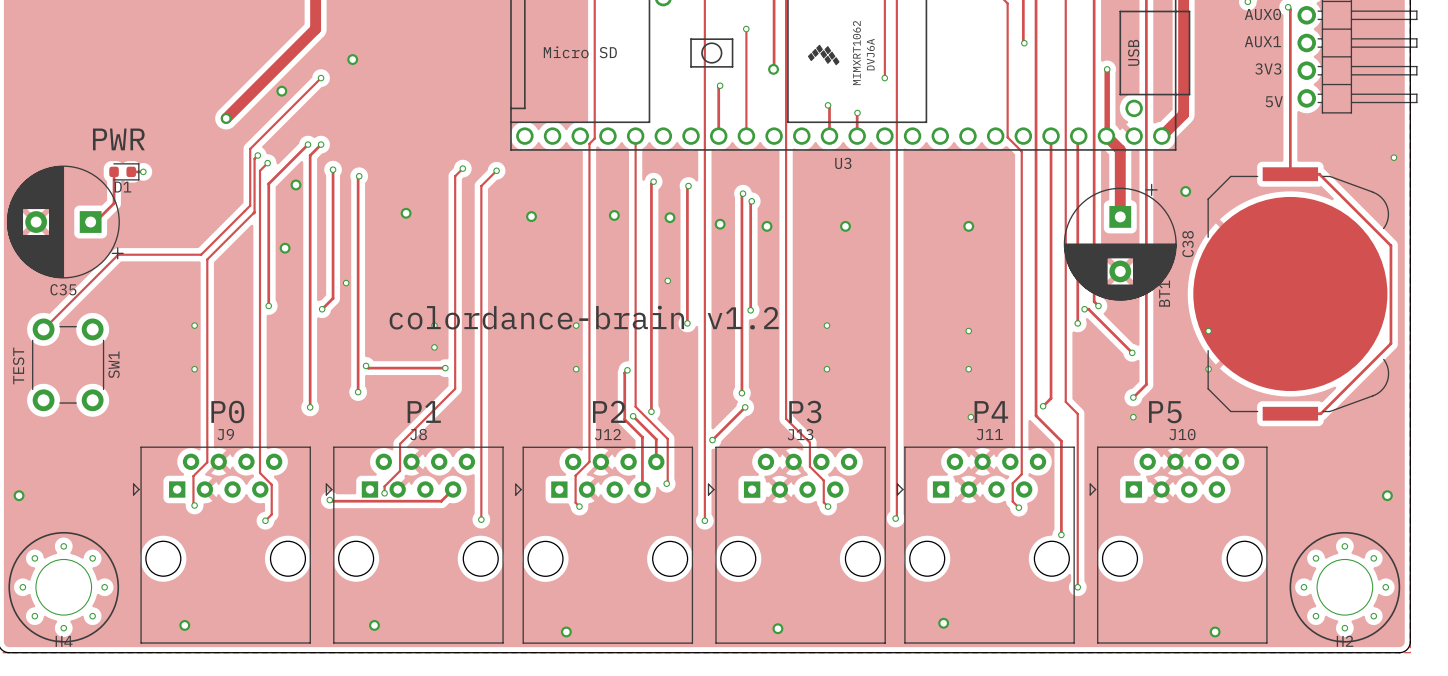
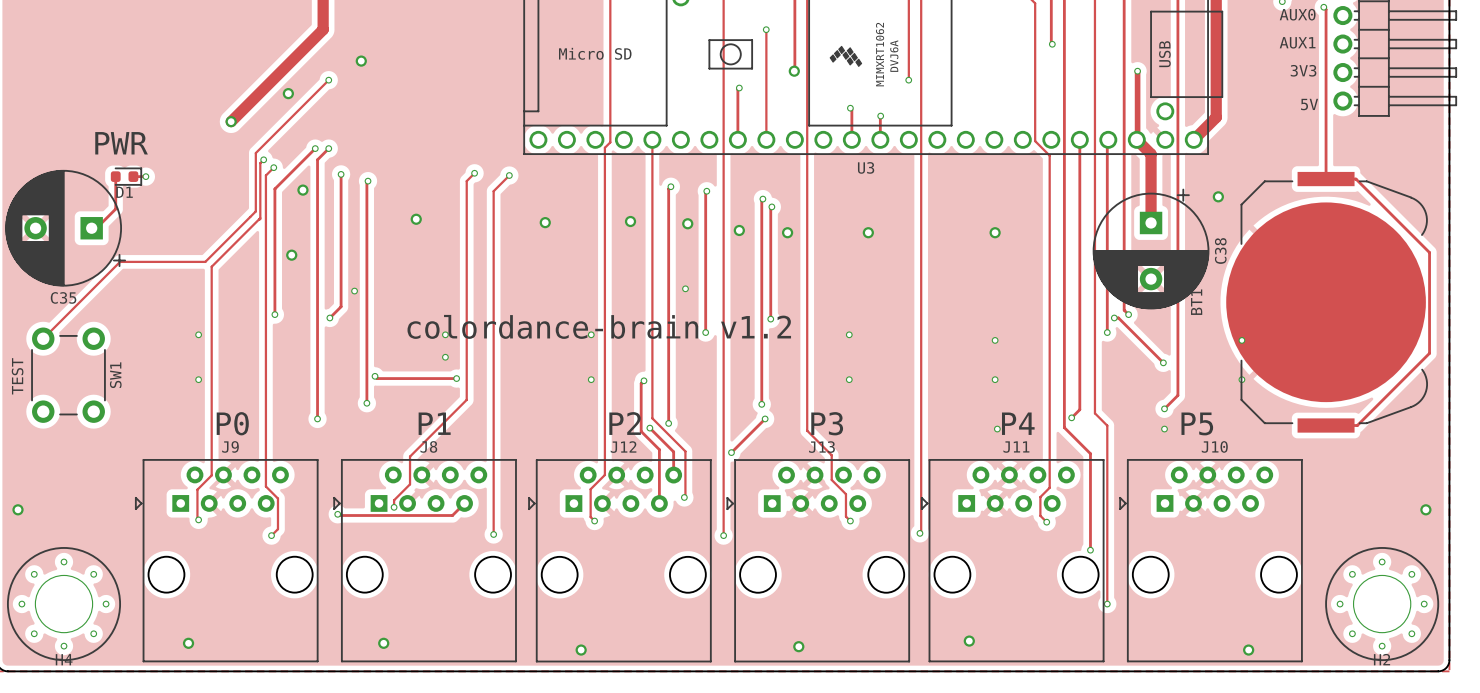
via: (1393, 157) -> none

